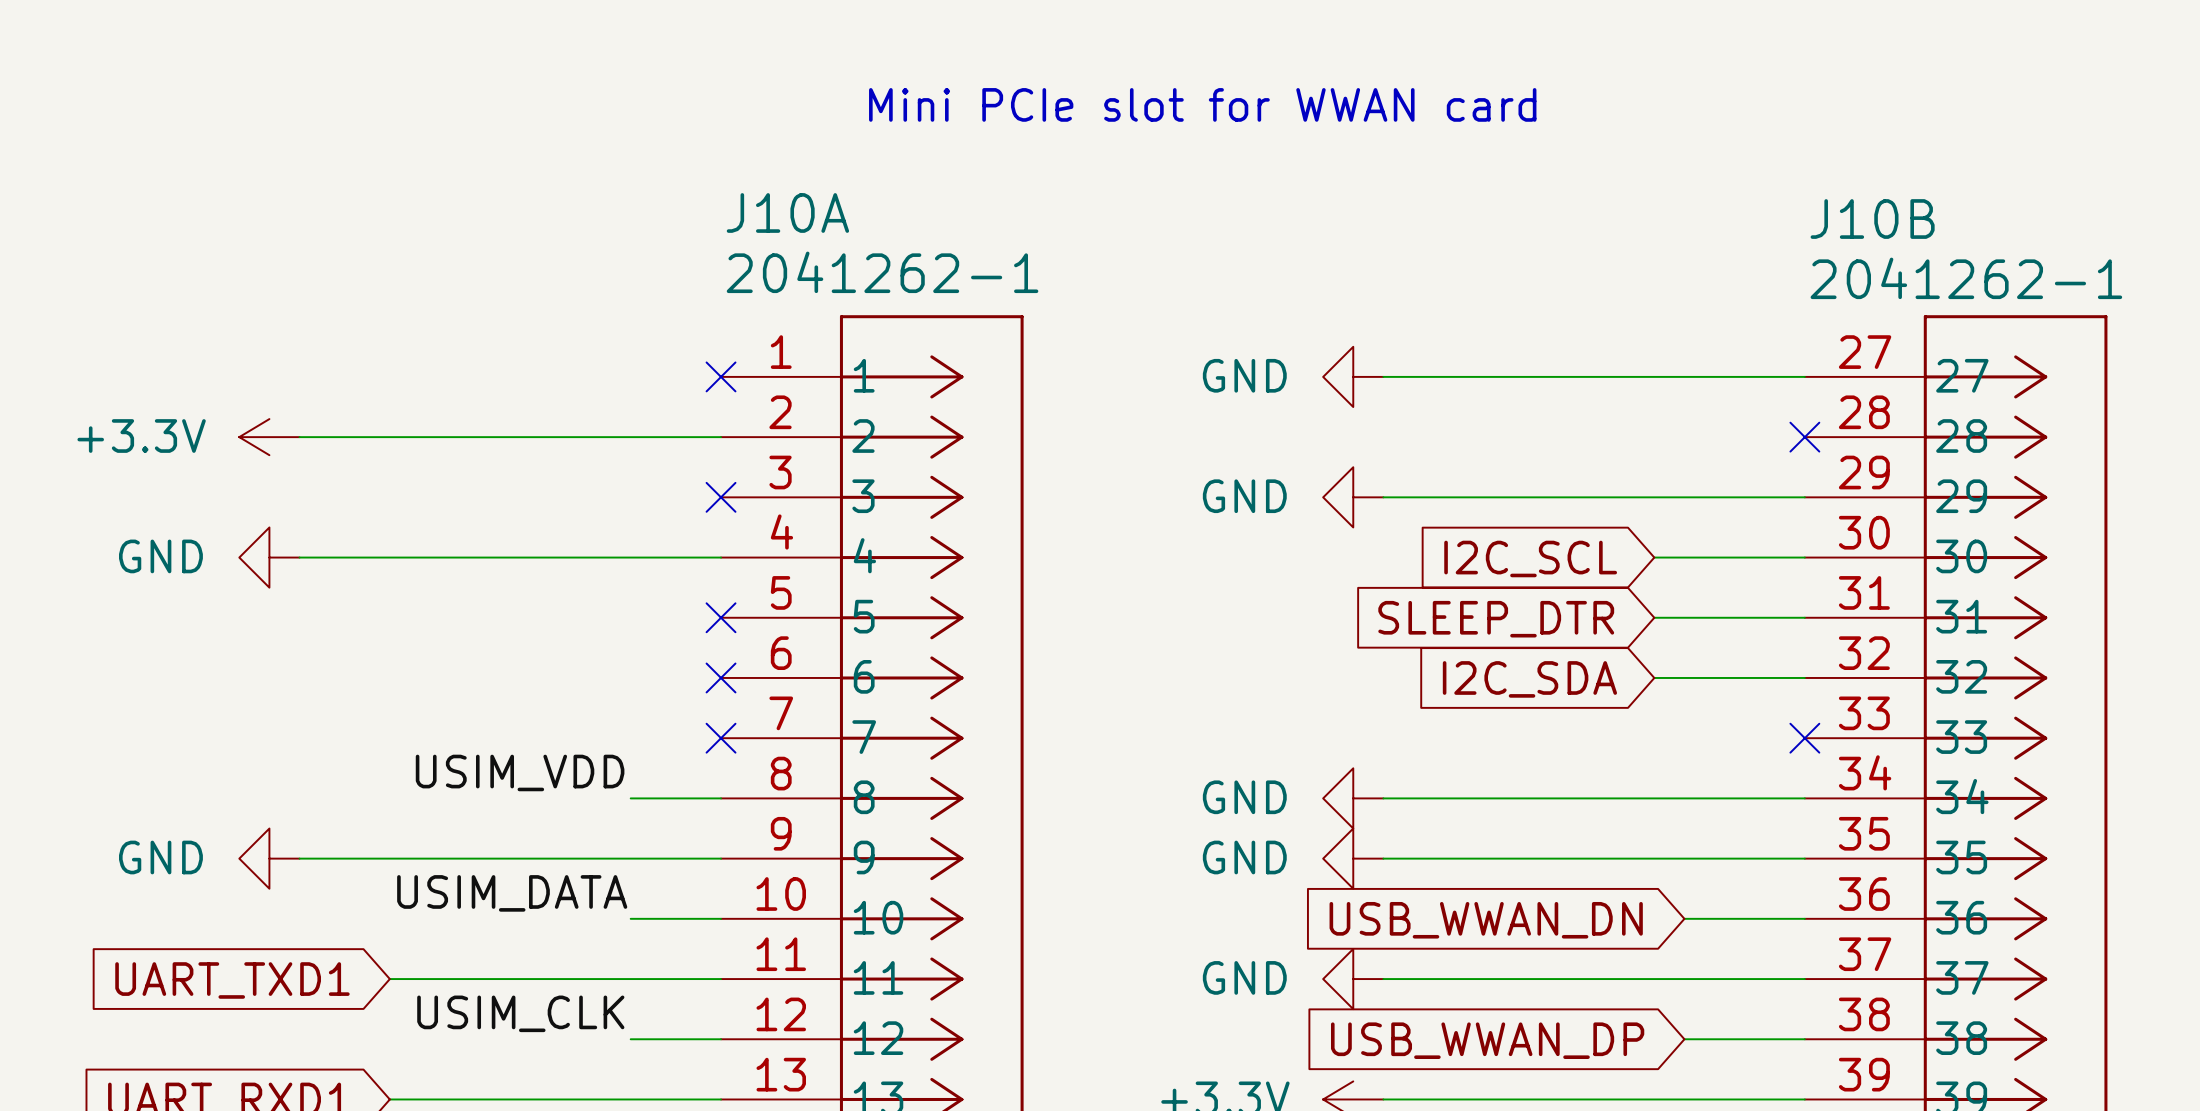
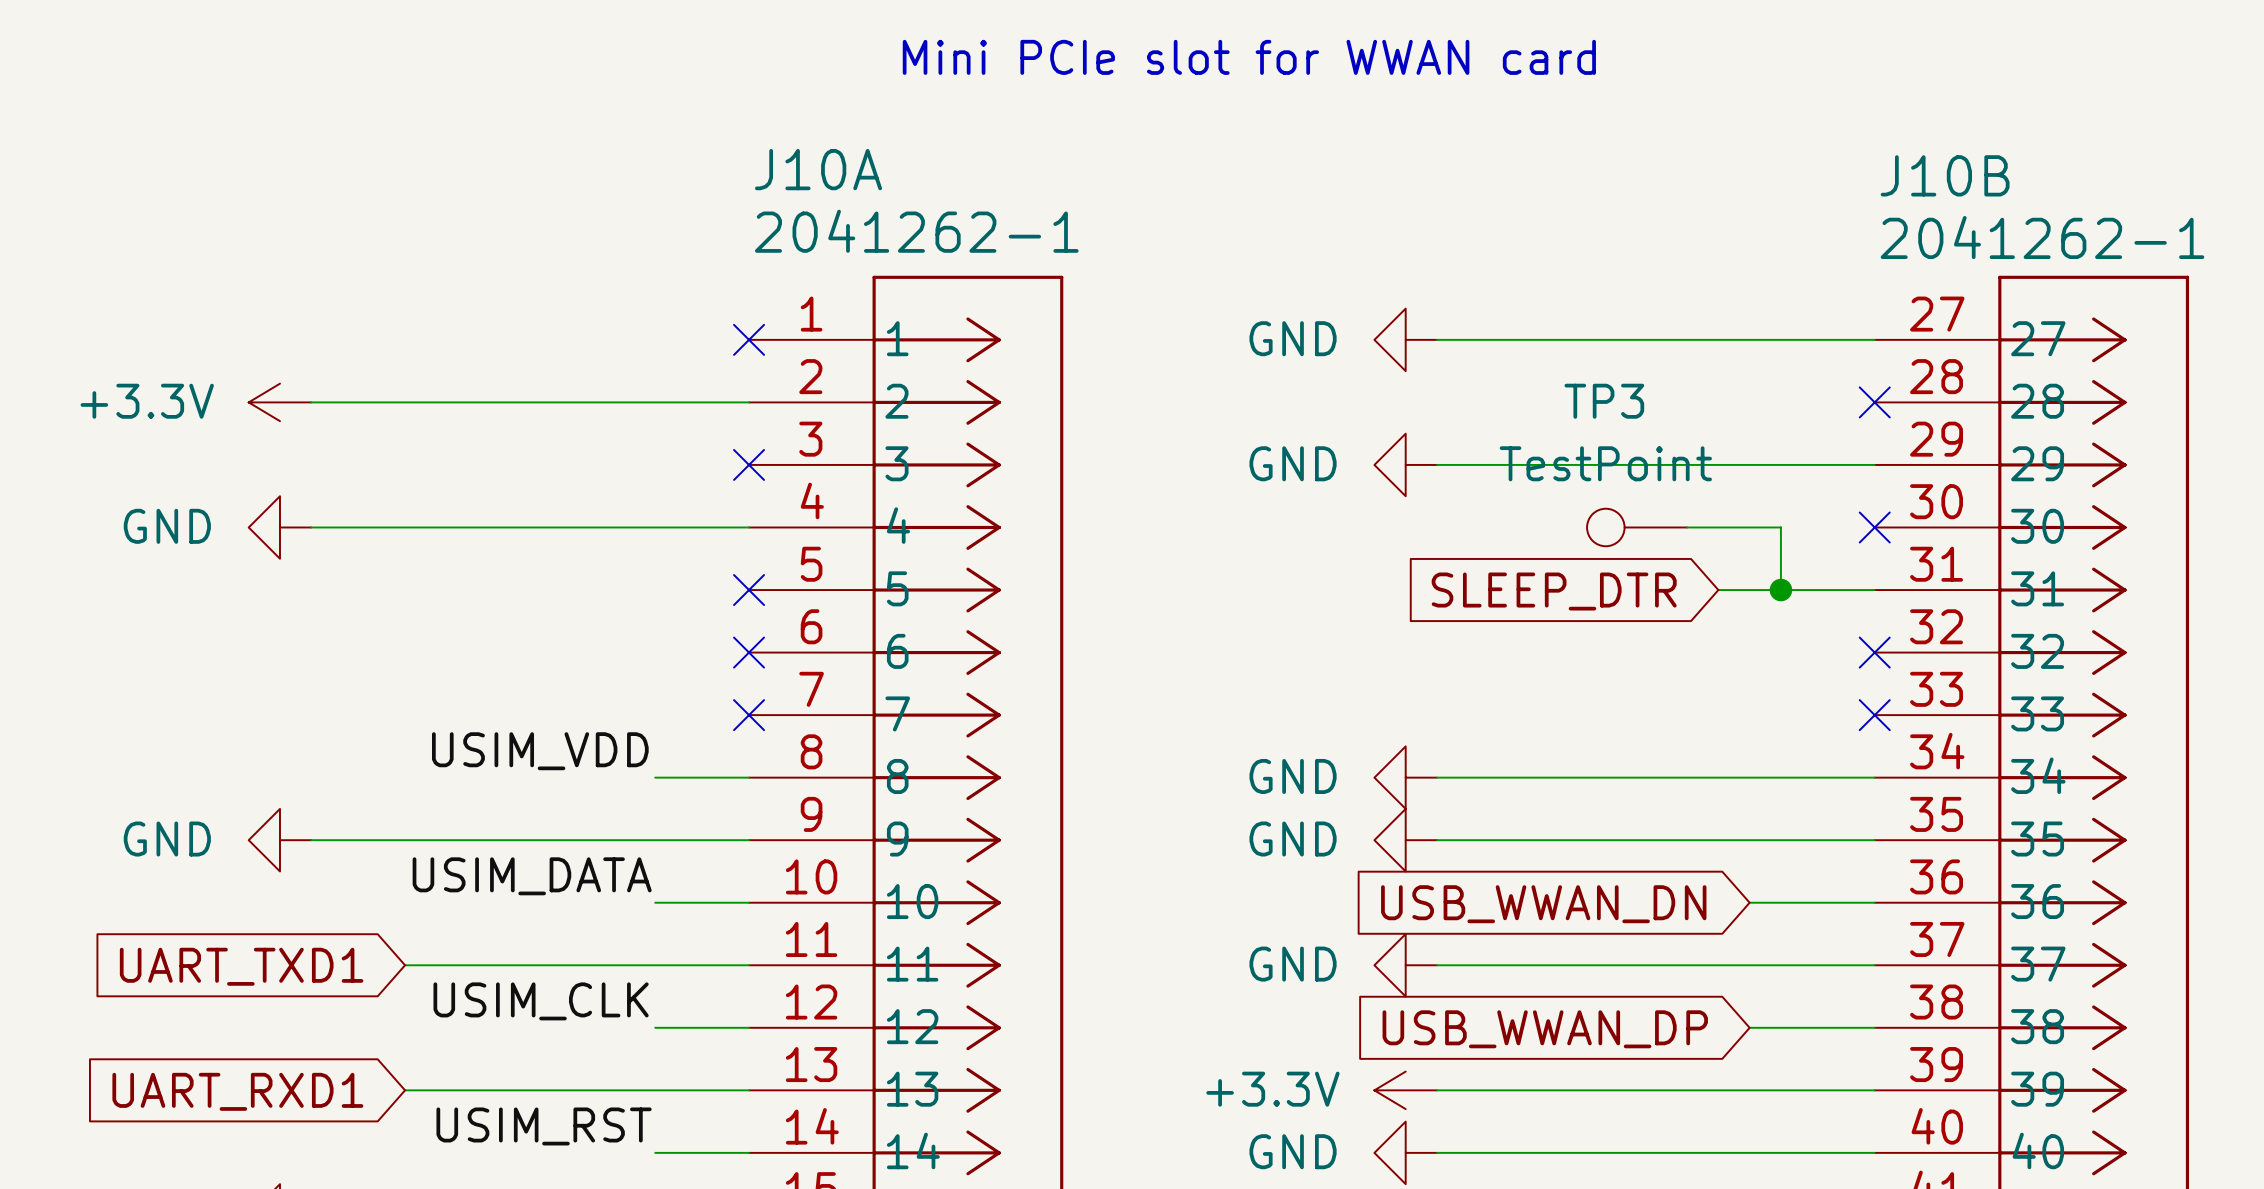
TP3: none -> TestPoint (1637, 527)
wire: none -> (1687, 527) (1718, 527)
wire: (1714, 557) (1804, 557) -> (1780, 527) (1780, 590)
no-connect mark: none -> (1874, 527)
global label: I2C_SCL (1530, 558) -> none
junction: none -> (1780, 590)
wire: (1654, 677) (1804, 677) -> none
no-connect mark: none -> (1874, 652)
global label: I2C_SDA (1529, 679) -> none

